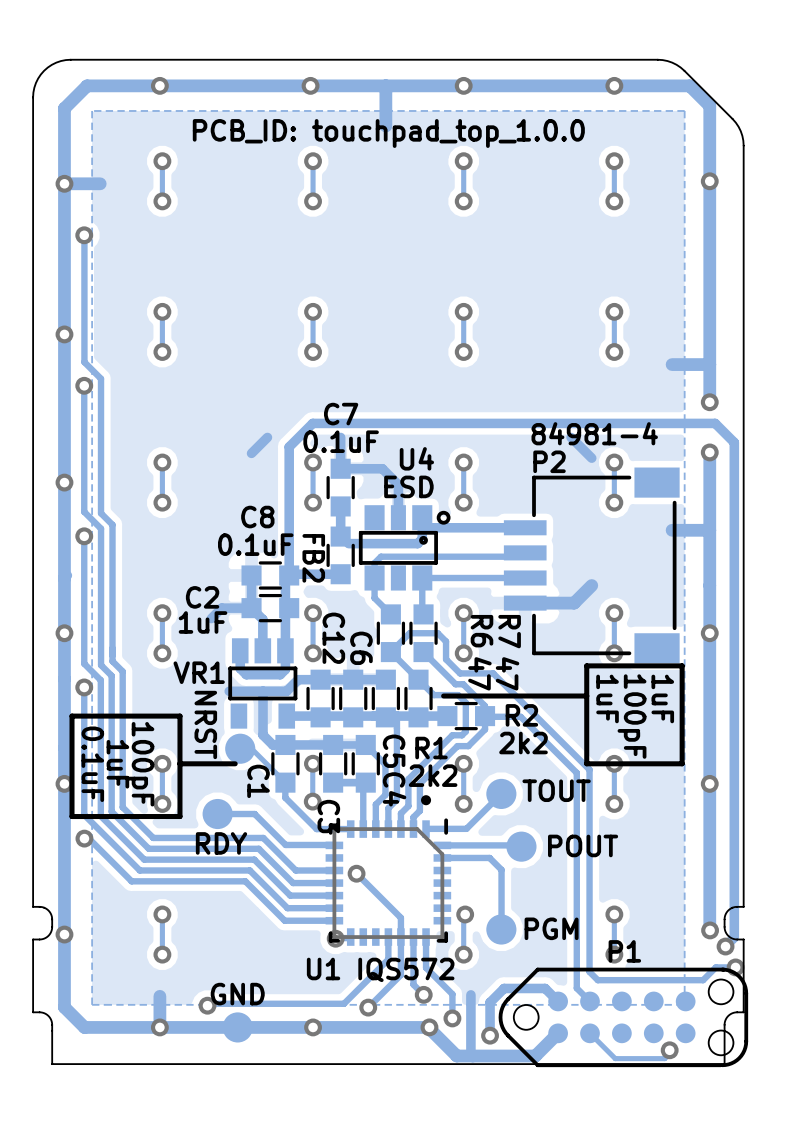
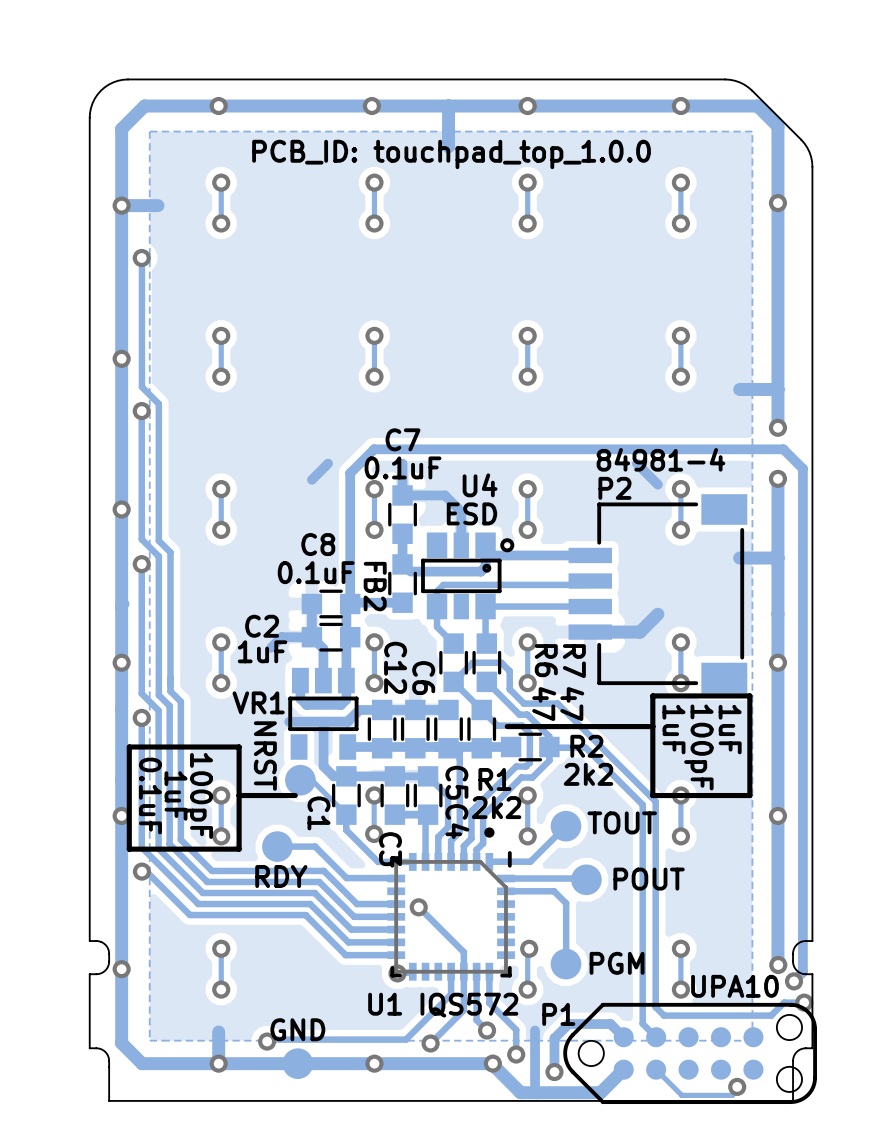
P1 name position: P1 (624, 951) -> P1 (558, 1014)
text: none -> UPA10 (735, 986)

